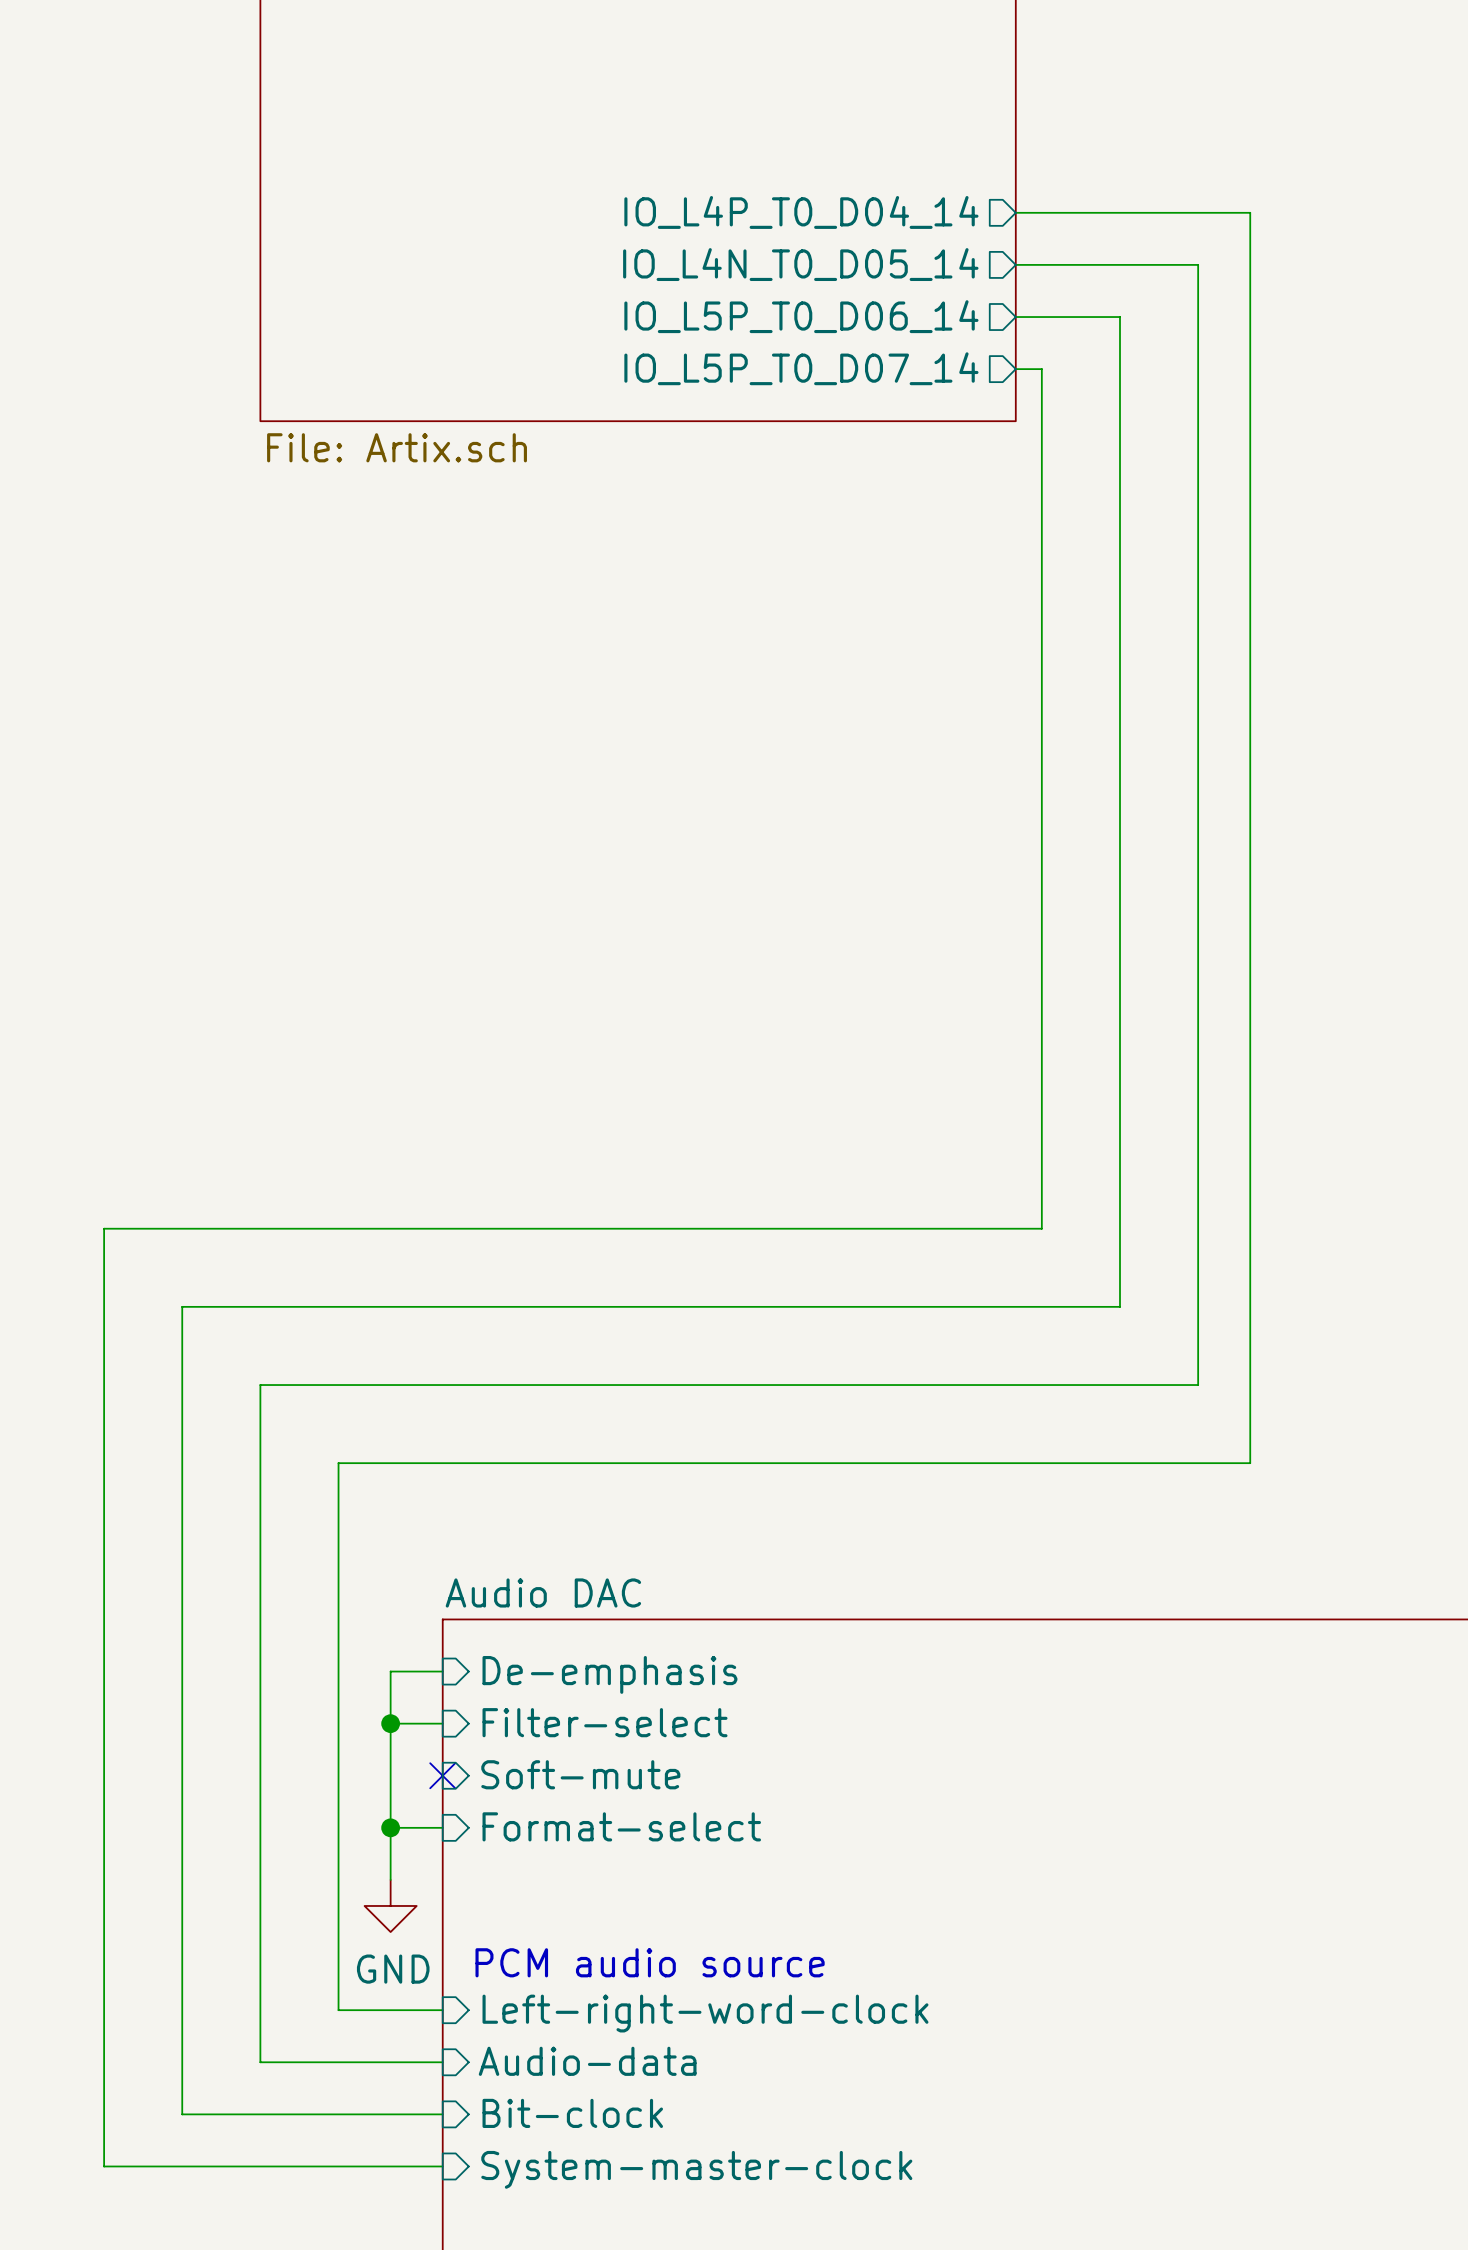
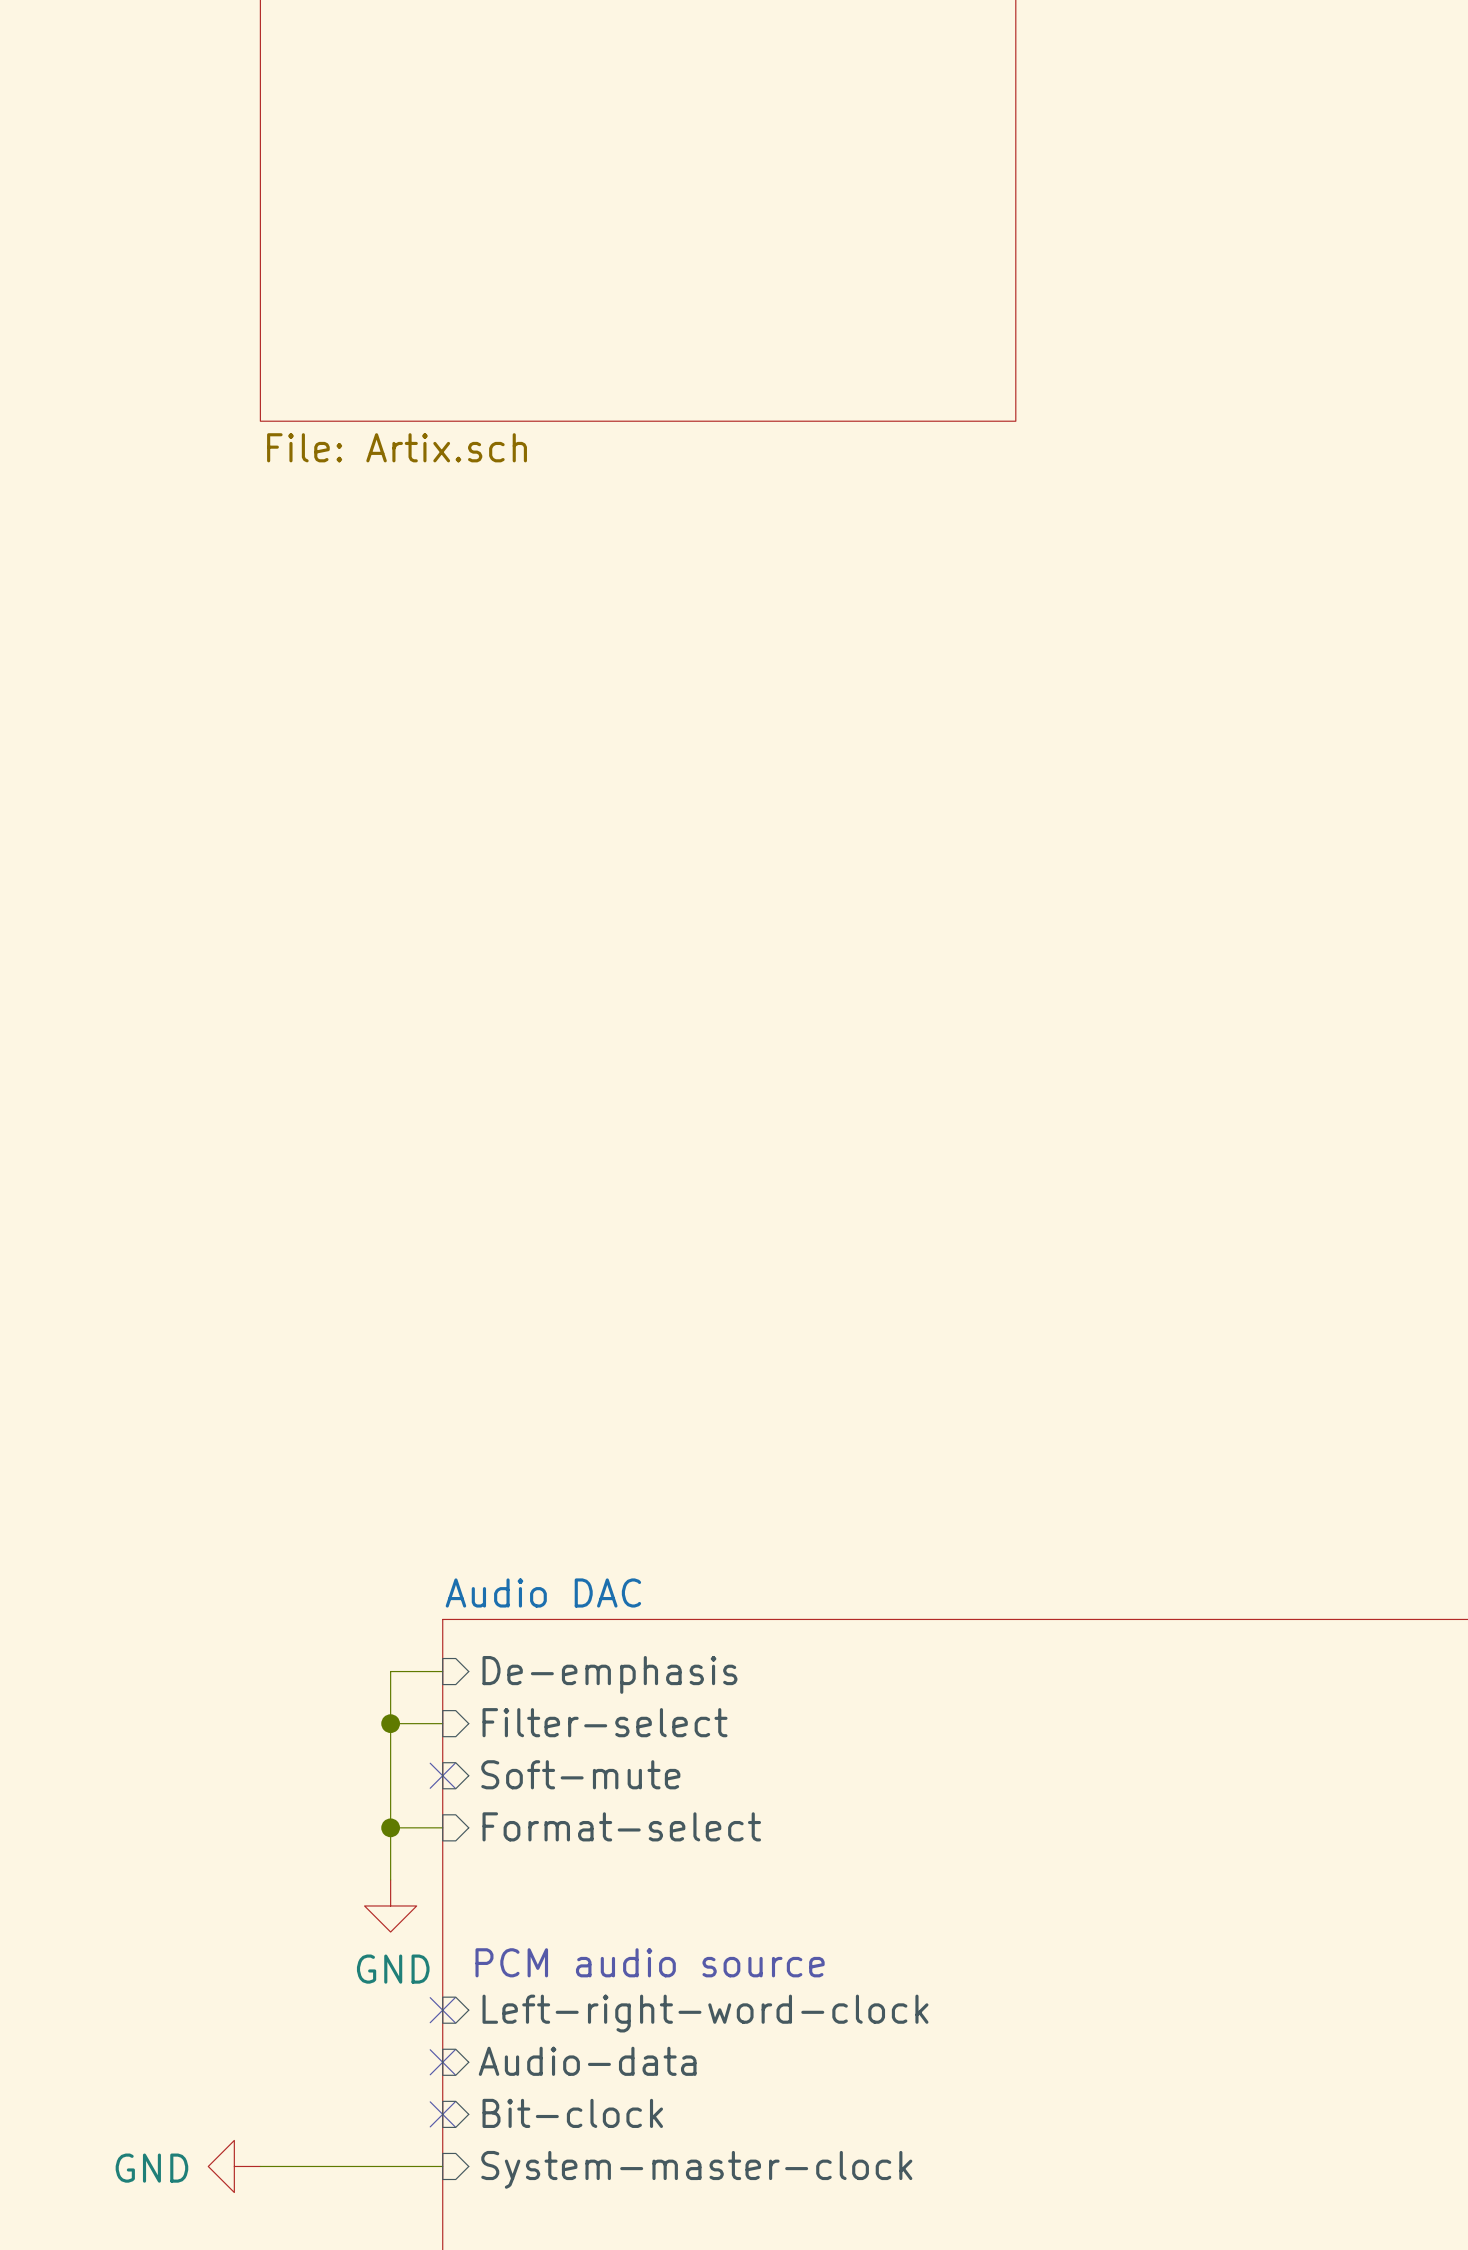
sheet pin: IO_L4P_T0_D04_14 (801, 212) -> none
wire: (1015, 212) (1250, 212) (1250, 1463) (338, 1463) (338, 2010) (442, 2010) -> none
sheet pin: IO_L4N_T0_D05_14 (800, 264) -> none
wire: (1015, 264) (1198, 264) (1198, 1385) (260, 1385) (260, 2062) (442, 2062) -> none
sheet pin: IO_L5P_T0_D06_14 (801, 316) -> none
wire: (1015, 317) (1119, 317) (1119, 1306) (182, 1306) (182, 2114) (442, 2114) -> none
sheet pin: IO_L5P_T0_D07_14 (801, 368) -> none
wire: (1015, 369) (1041, 369) (1041, 1228) (104, 1228) (104, 2166) (260, 2166) -> none
no-connect mark: none -> (442, 2010)
no-connect mark: none -> (442, 2062)
no-connect mark: none -> (442, 2114)
power symbol: none -> GND (234, 2166)

